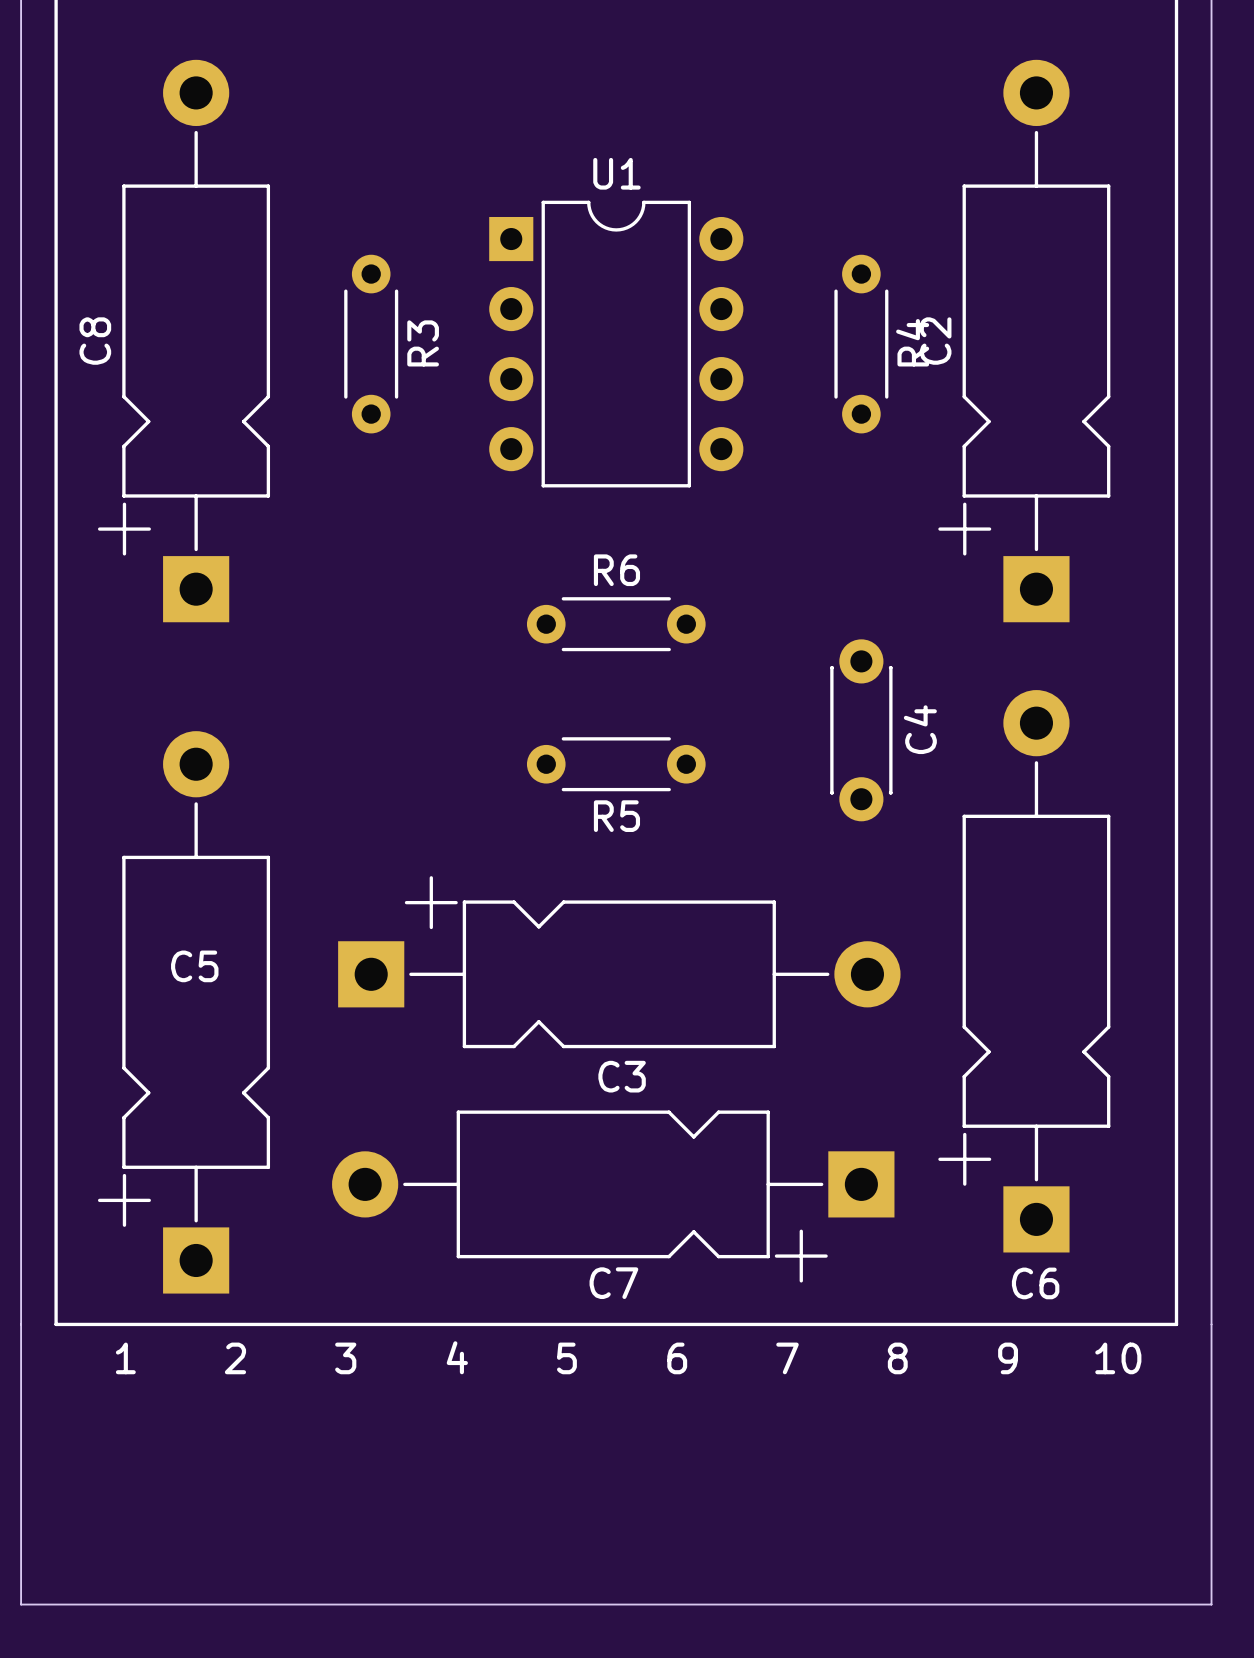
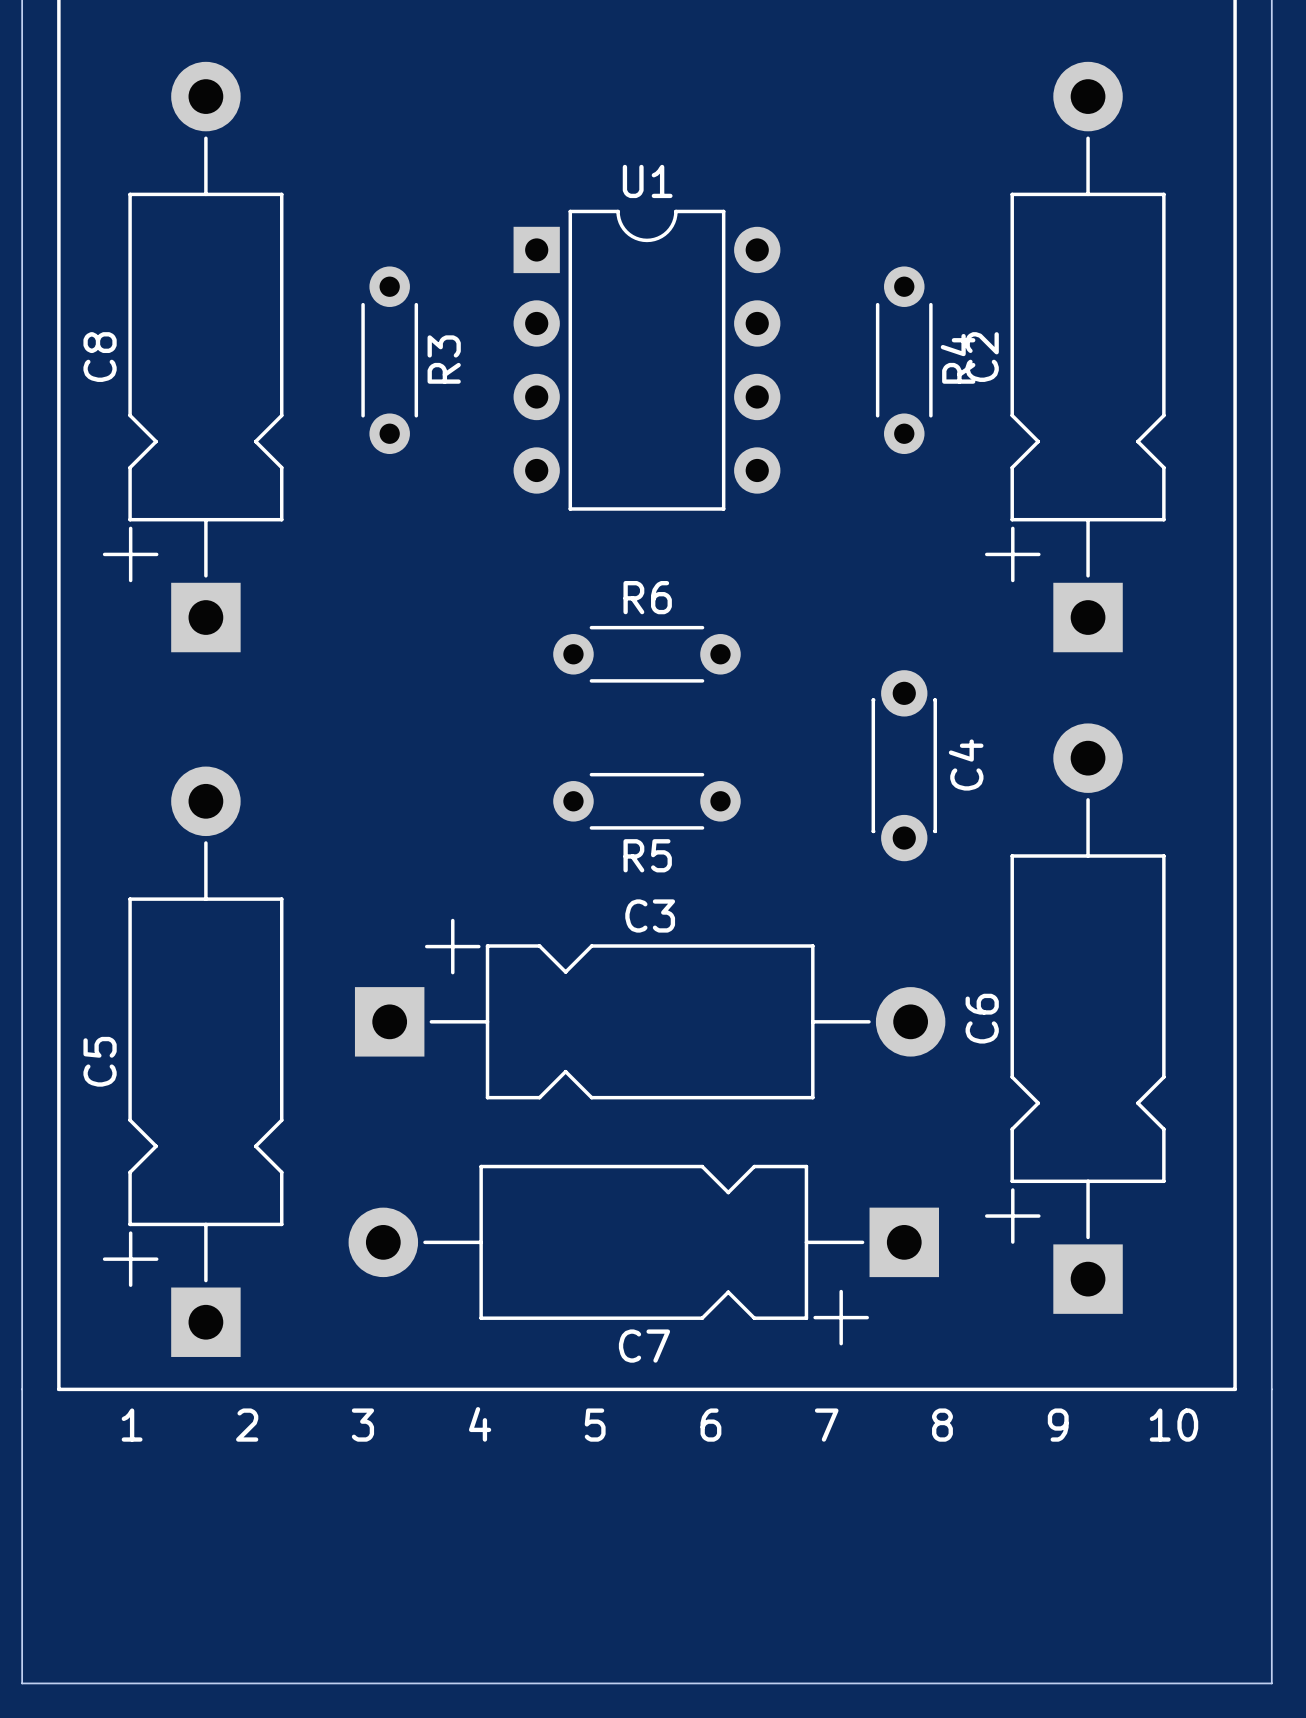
C5 name rotation: 0° (194, 966) -> 90° counterclockwise (100, 1061)
C5 name position: C5 (194, 966) -> C5 (100, 1061)
C3 name position: C3 (622, 1076) -> C3 (650, 915)
C6 name rotation: 0° (1035, 1283) -> 90° counterclockwise (982, 1018)
C6 name position: C6 (1035, 1283) -> C6 (982, 1018)

